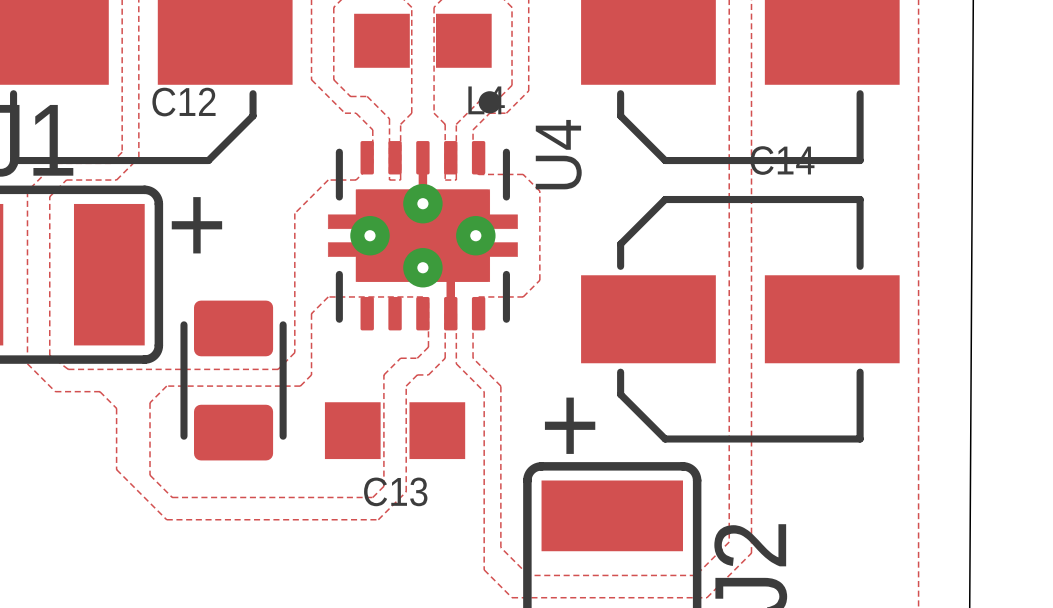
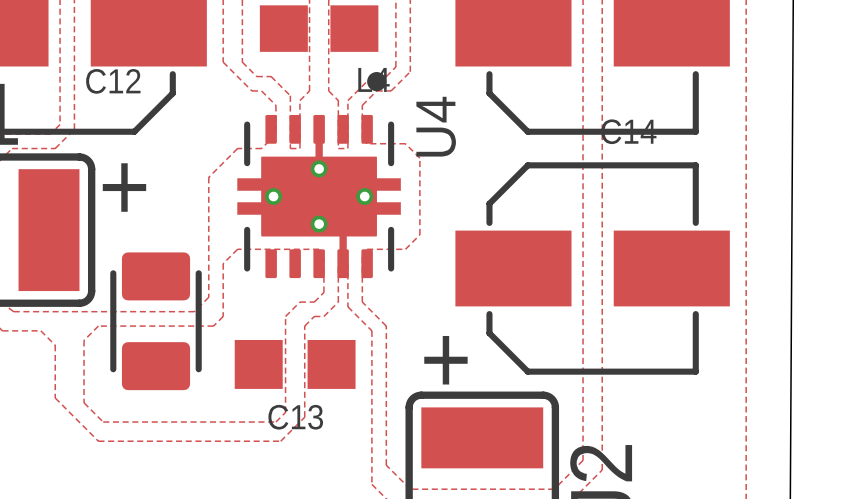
U4 footprint: [327, 91, 518, 331] -> [237, 72, 401, 279]

